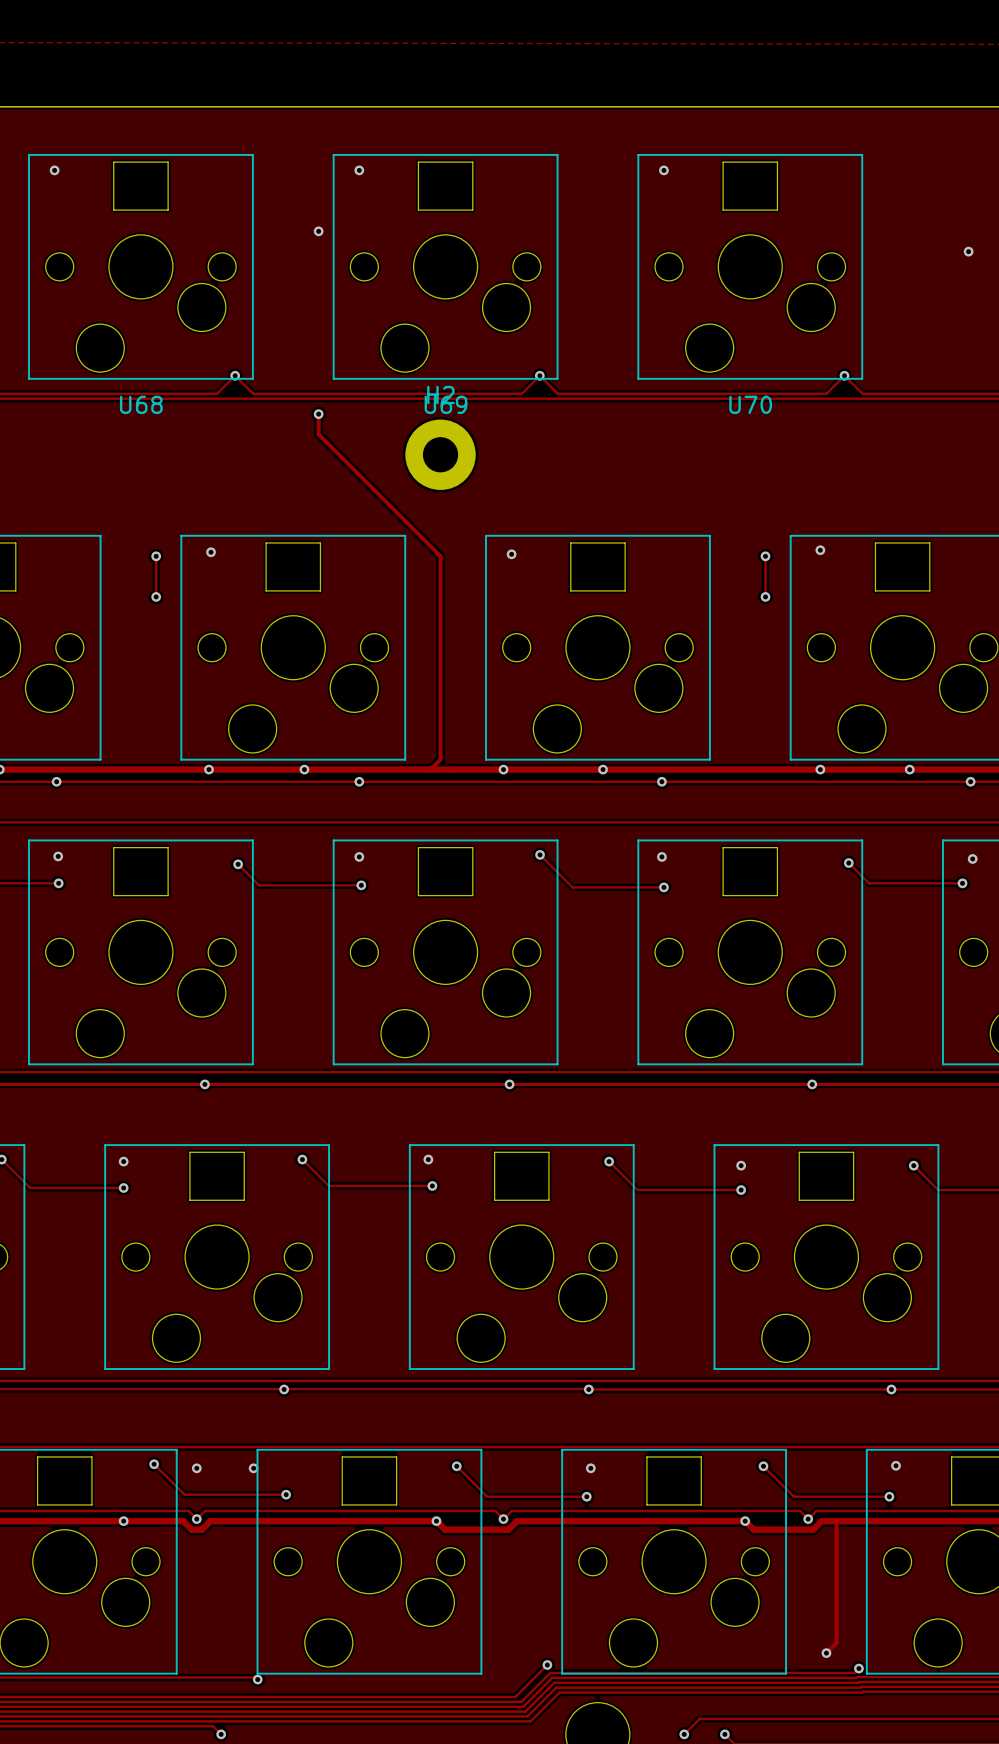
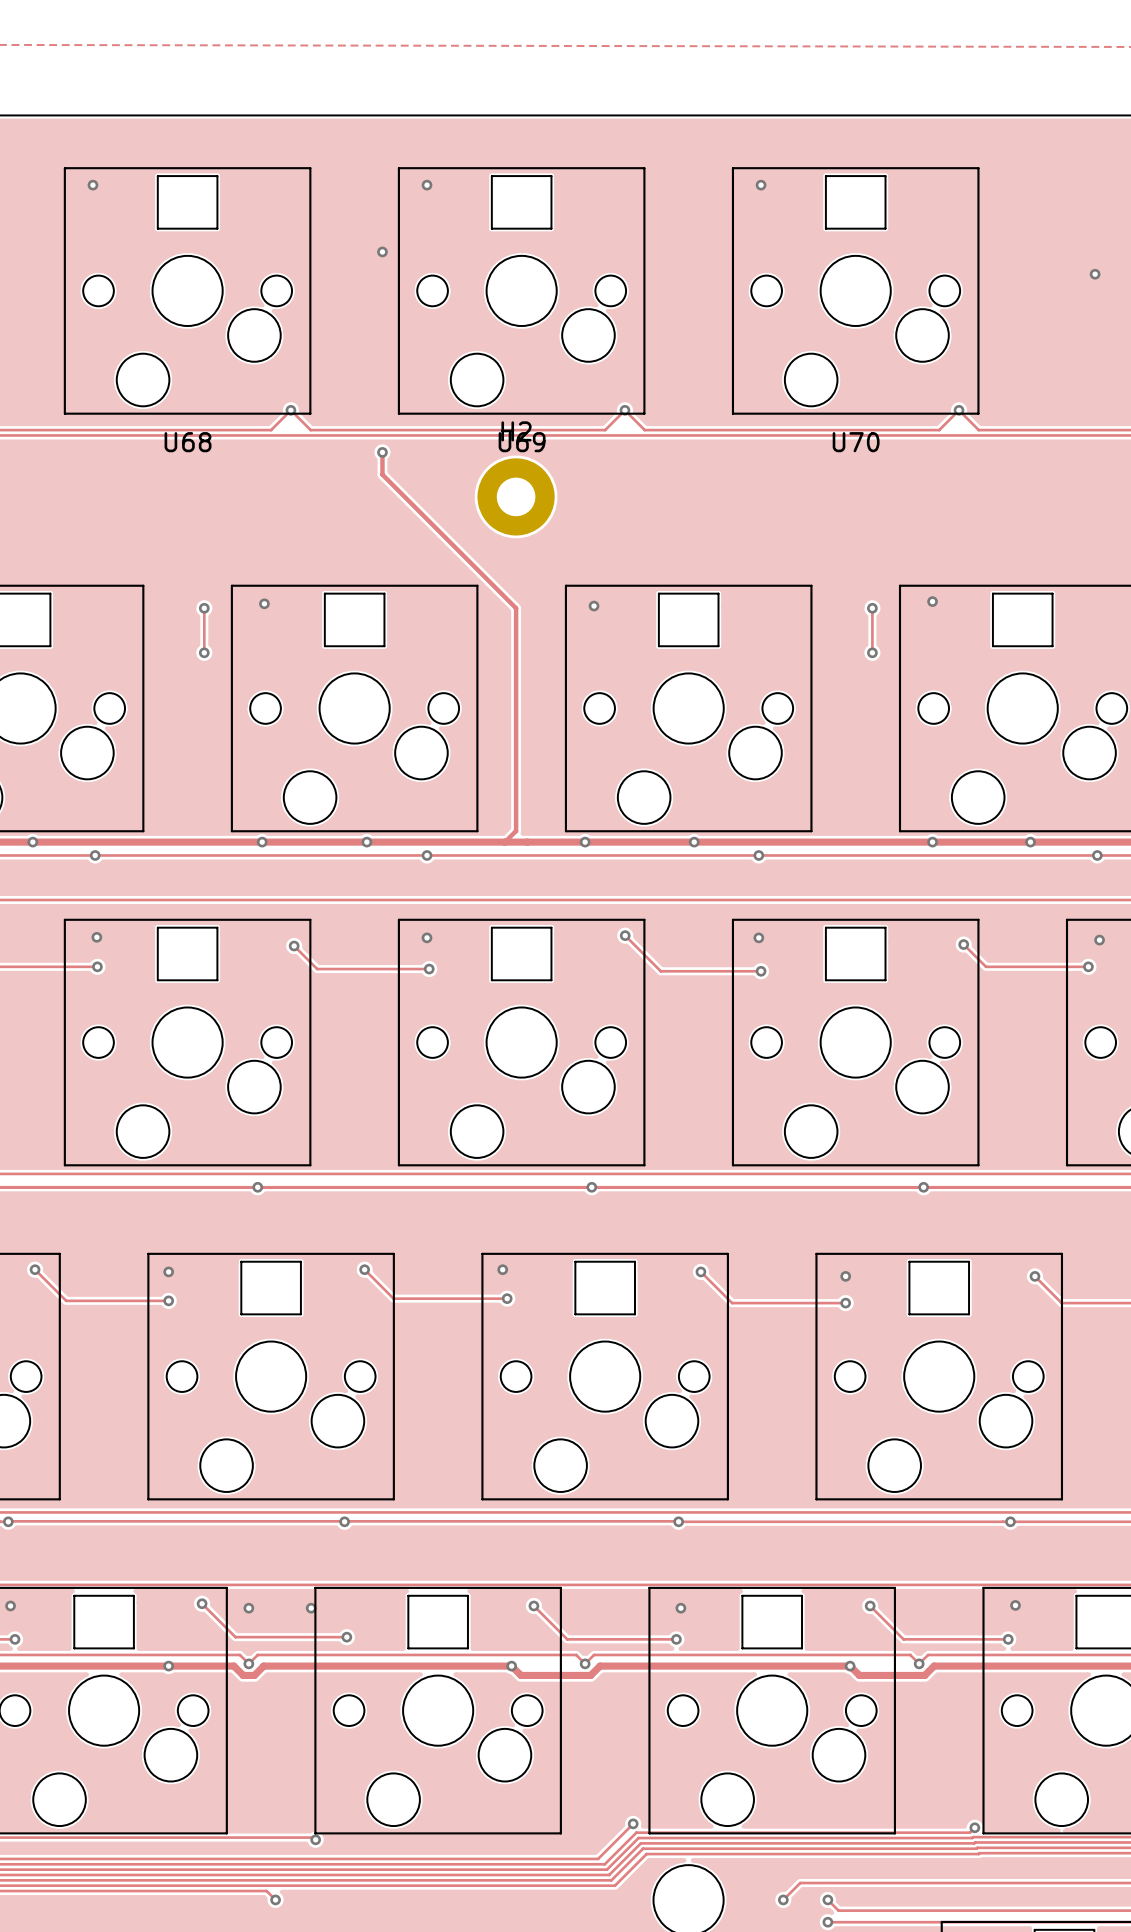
track: (836, 1521) (836, 1642) (826, 1653) -> none
via: (826, 1653) -> none

